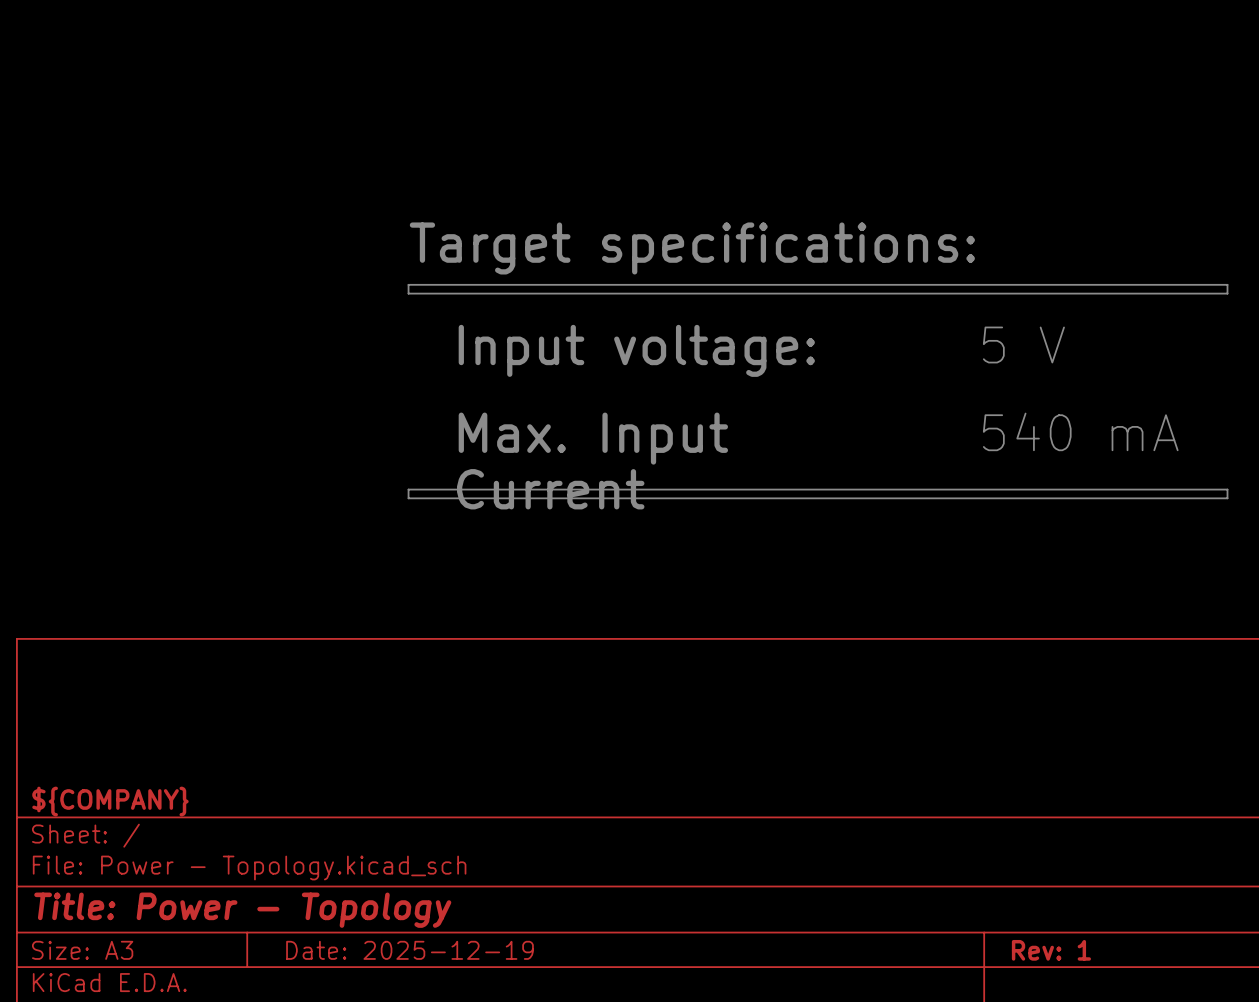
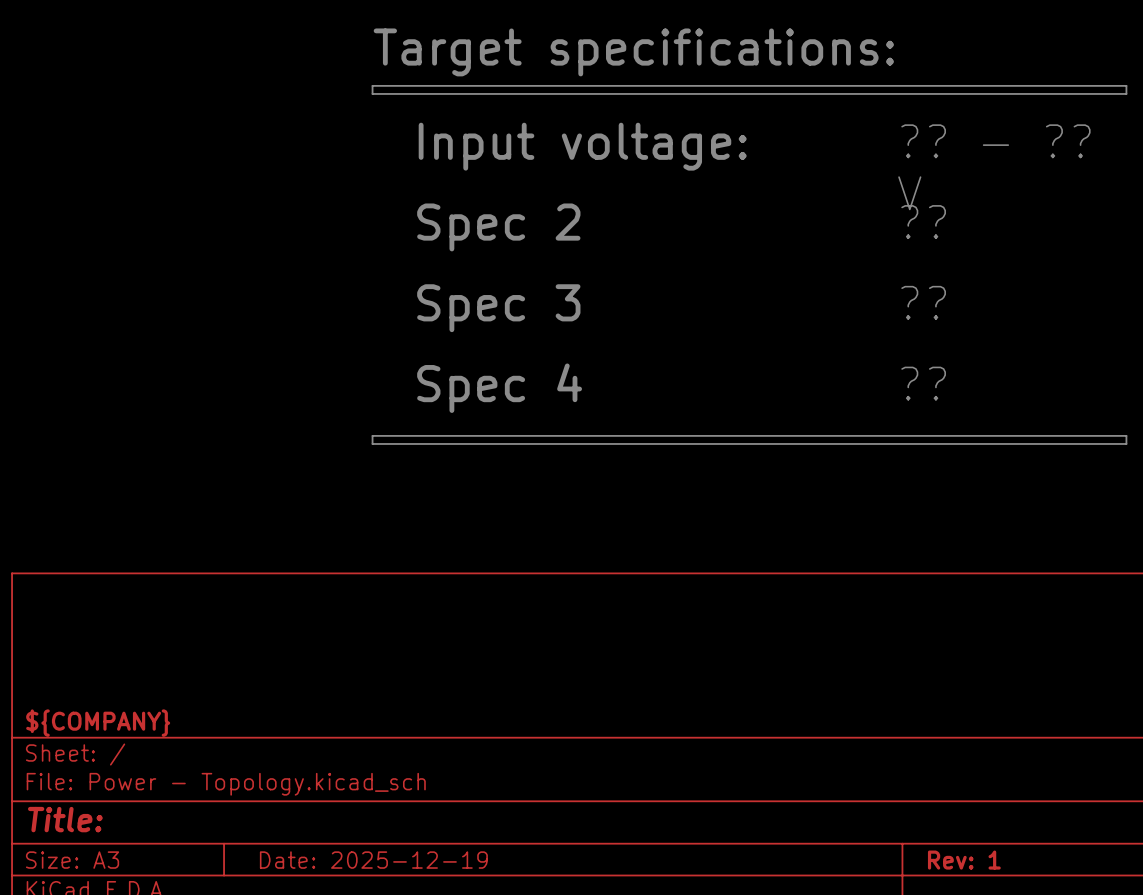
text: none -> ?? - ?? (995, 141)
text: none -> Input voltage: (582, 146)
text: none -> V (909, 193)
text position: Target specifications: (692, 248) -> Target specifications: (633, 52)
text: none -> ?? (923, 222)
text: none -> Spec 2 (498, 227)
line: (408, 284) (1227, 284) (1227, 293) (408, 293) (408, 284) -> (372, 85) (1126, 85) (1126, 93) (372, 93) (372, 85)
text: 5 V (1023, 345) -> ?? (923, 302)
text: Input voltage: (636, 350) -> Spec 3 (498, 308)
text: 540 mA (1080, 431) -> ?? (923, 383)
text: Max. Input (593, 438) -> Spec 4 (499, 388)
text: Current (550, 489) -> none
title block: Title: Power - Topology (242, 910) -> Title: (65, 819)

